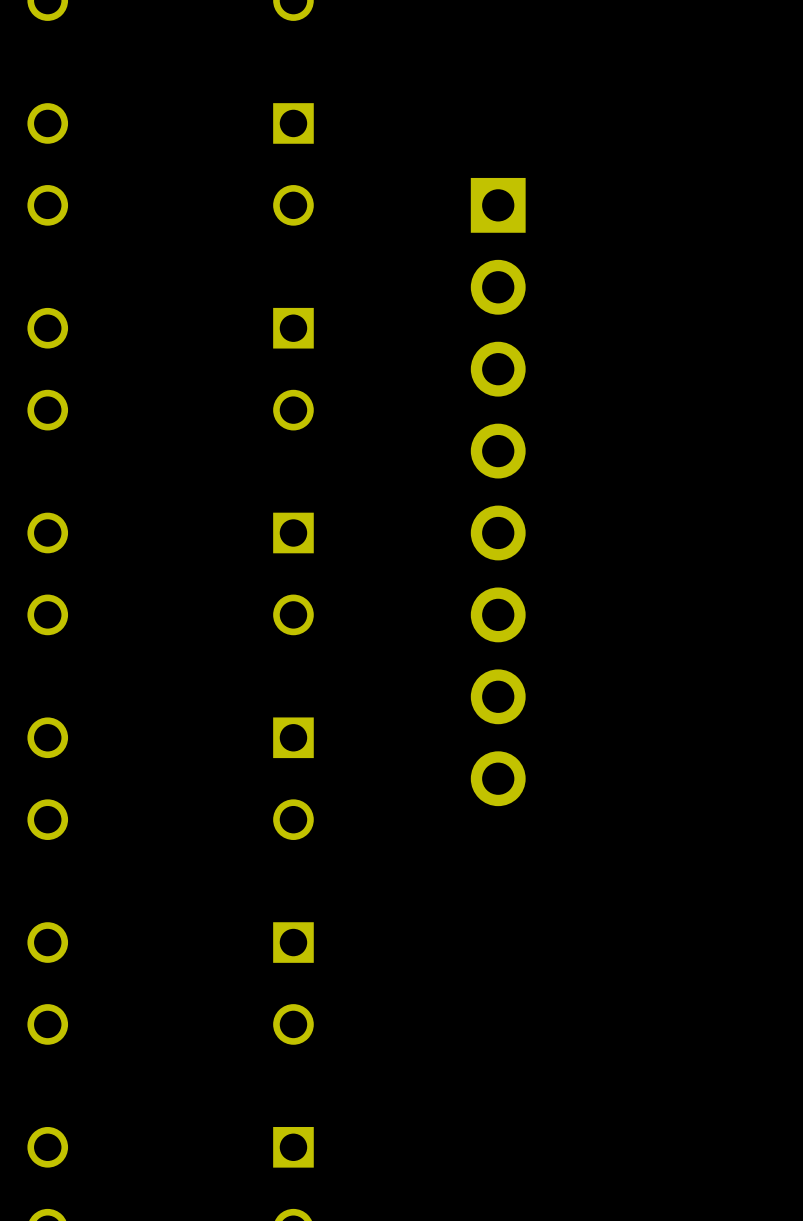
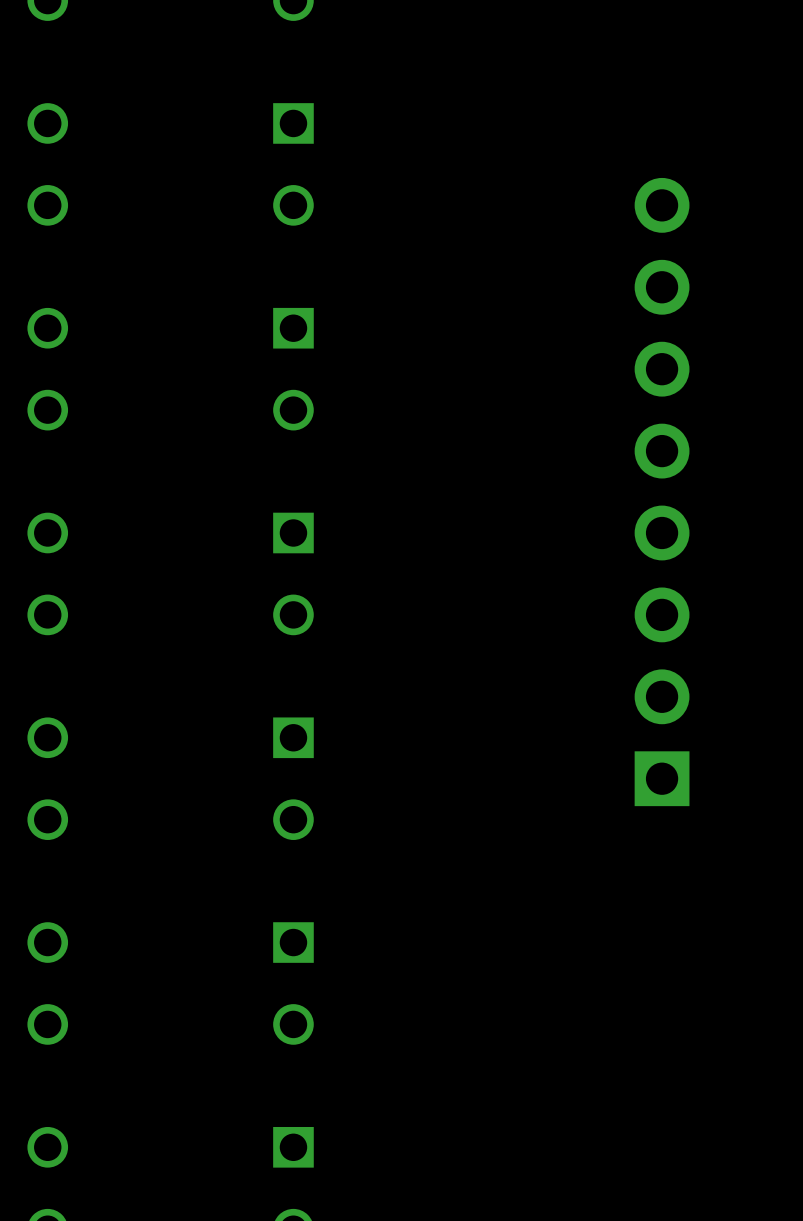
part rotation: 0° (498, 492) -> 180° (662, 492)

